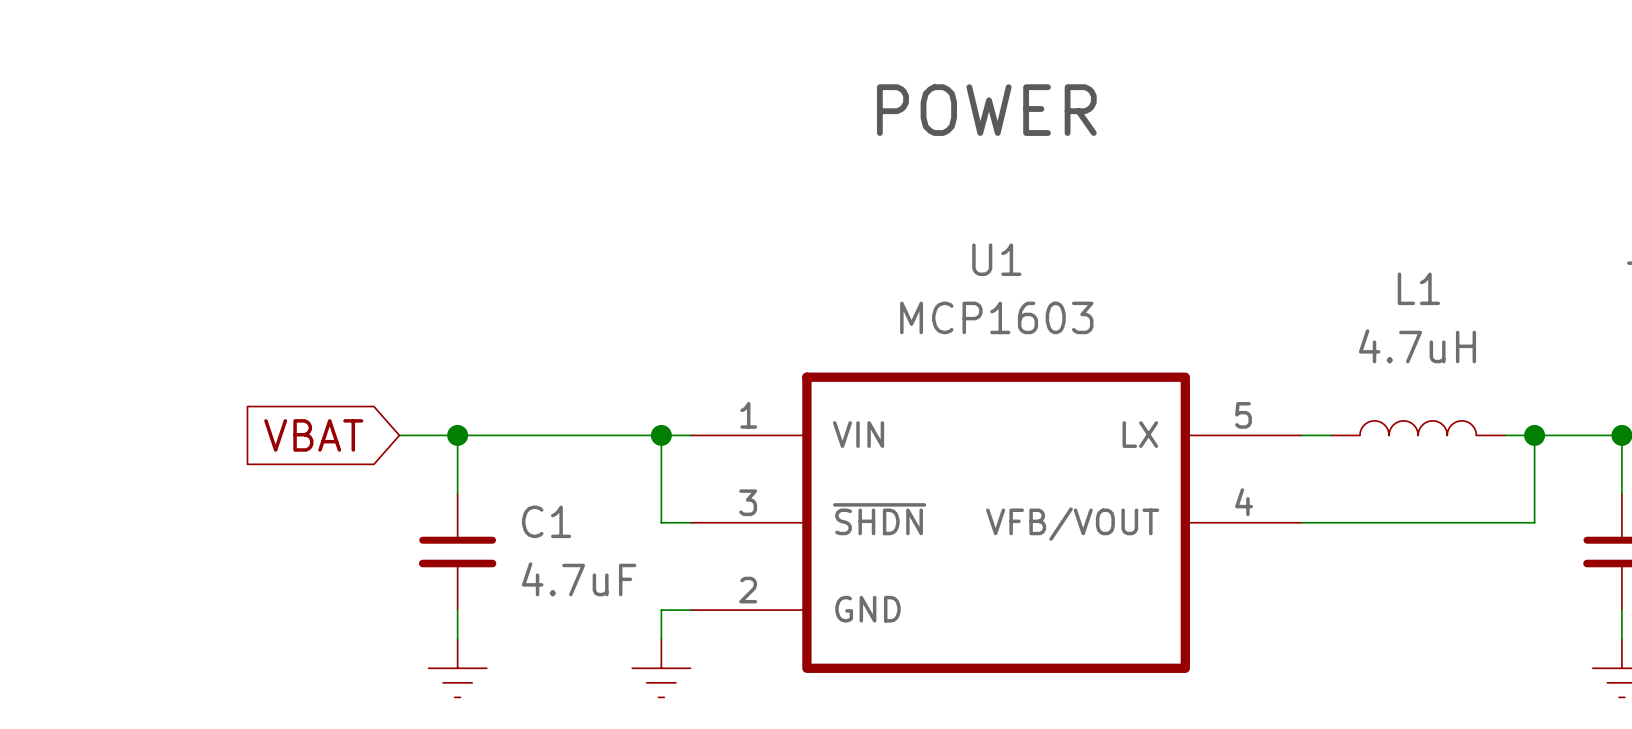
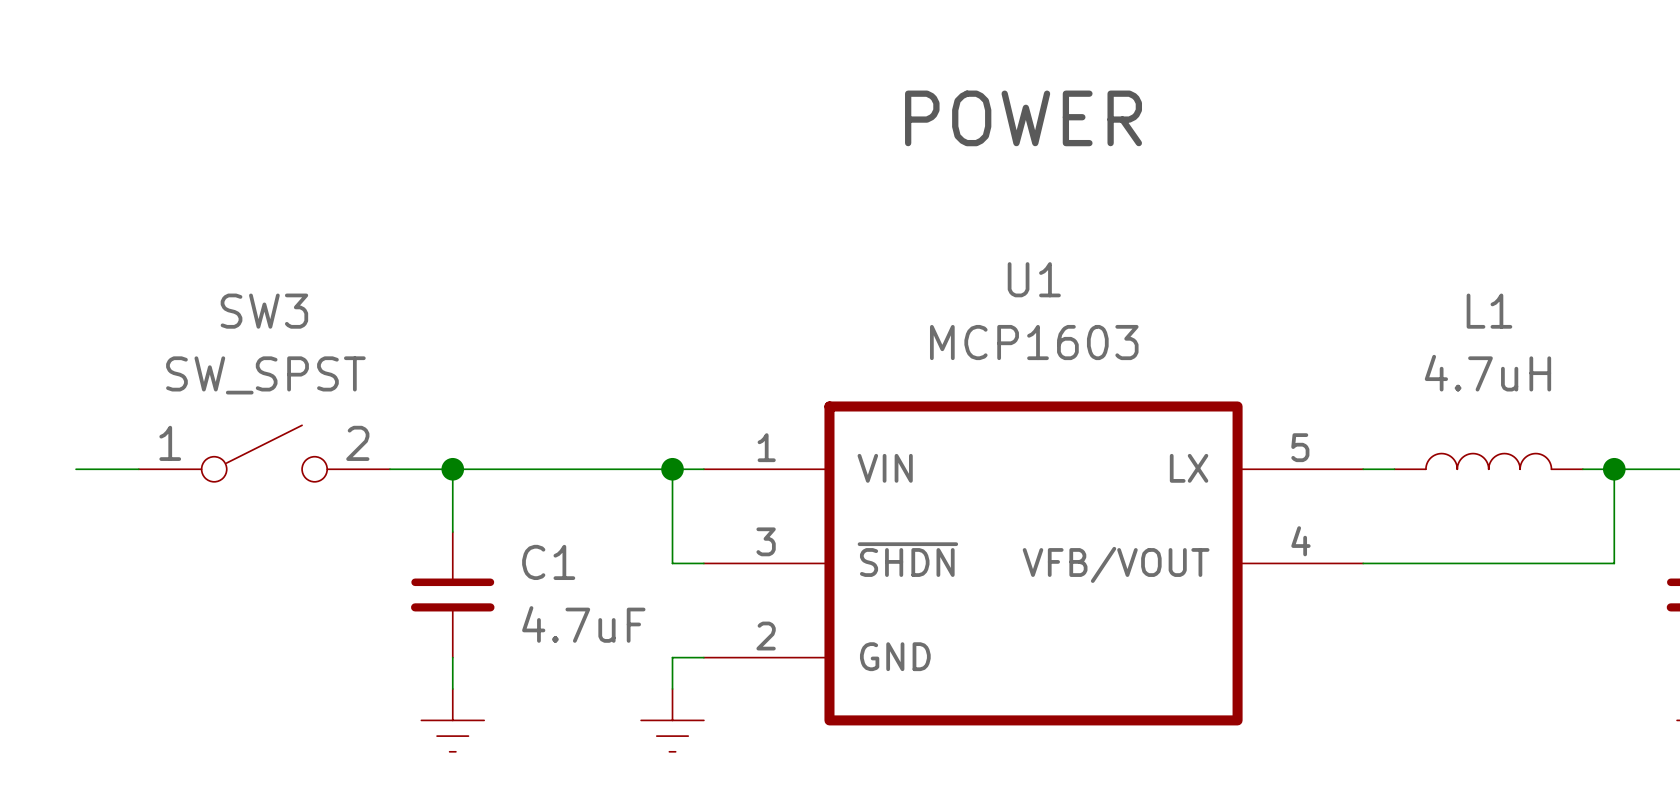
SW3: none -> SW_SPST (264, 453)
wire: none -> (76, 469) (138, 469)
global label: VBAT (313, 435) -> none

